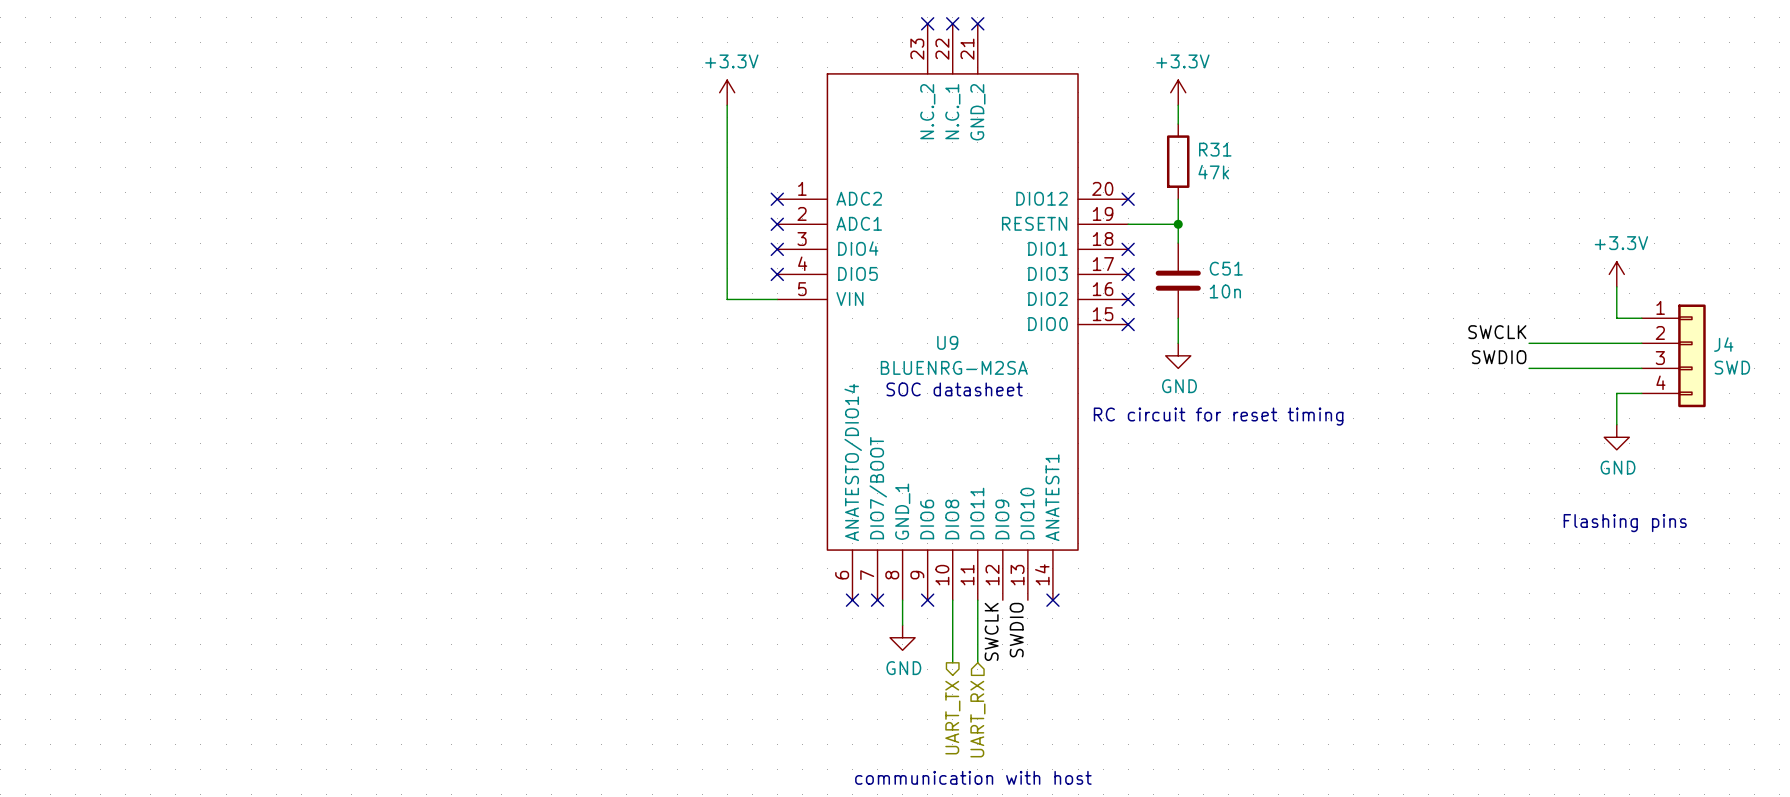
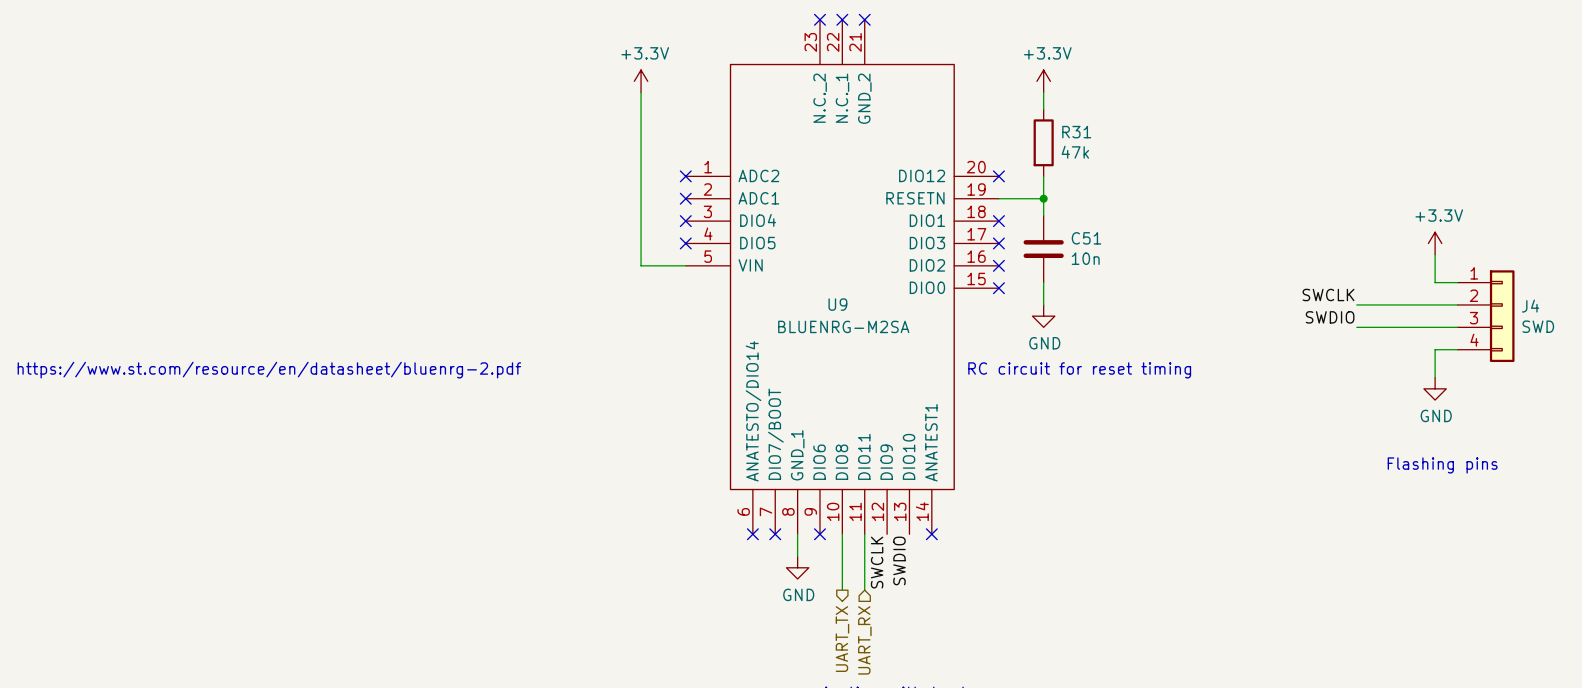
text: SOC datasheet (954, 389) -> none
text: none -> https://www.st.com/resource/en/datasheet/bluenrg-2.pdf (269, 370)

